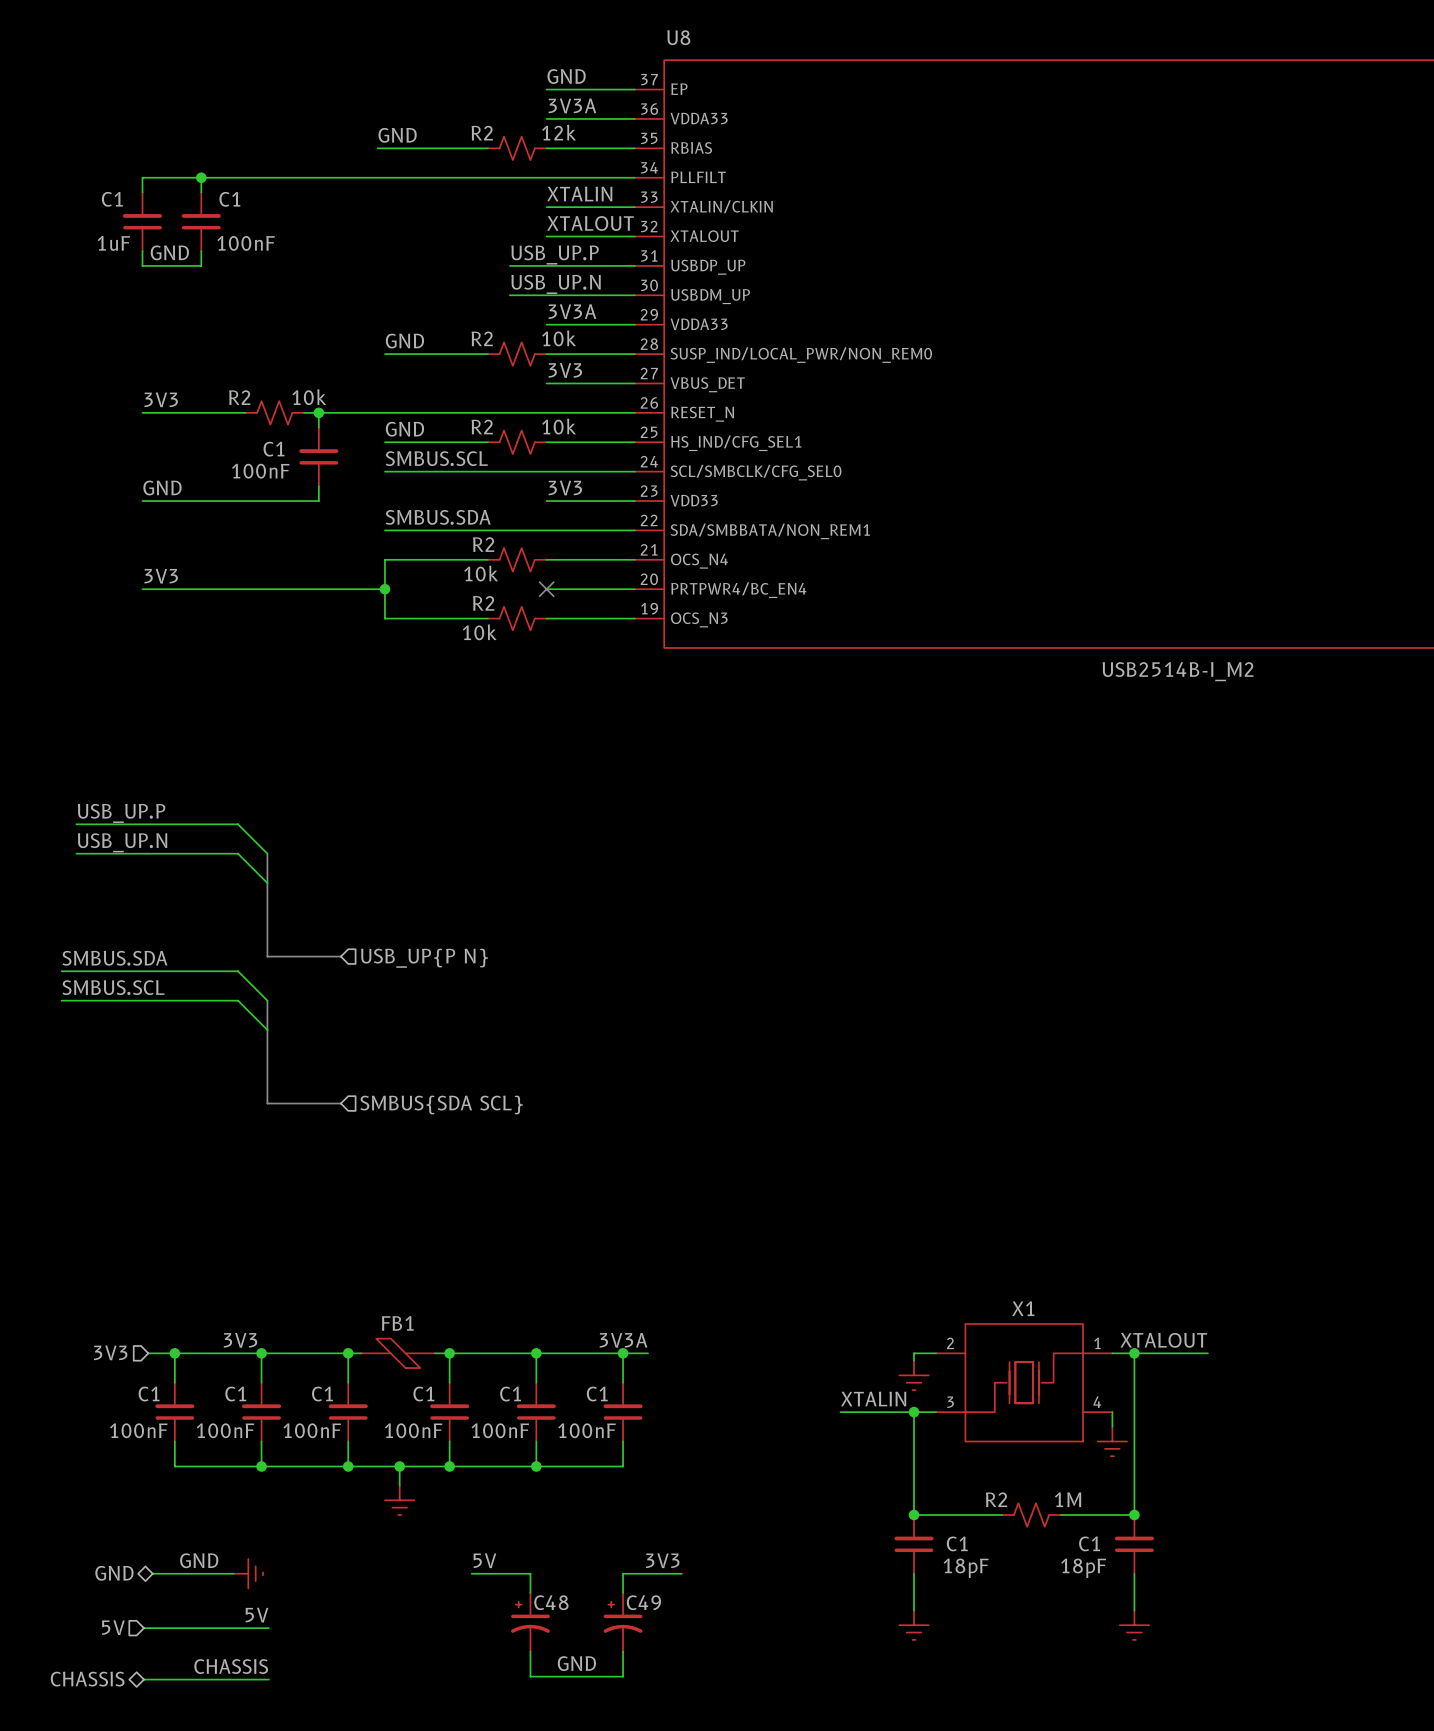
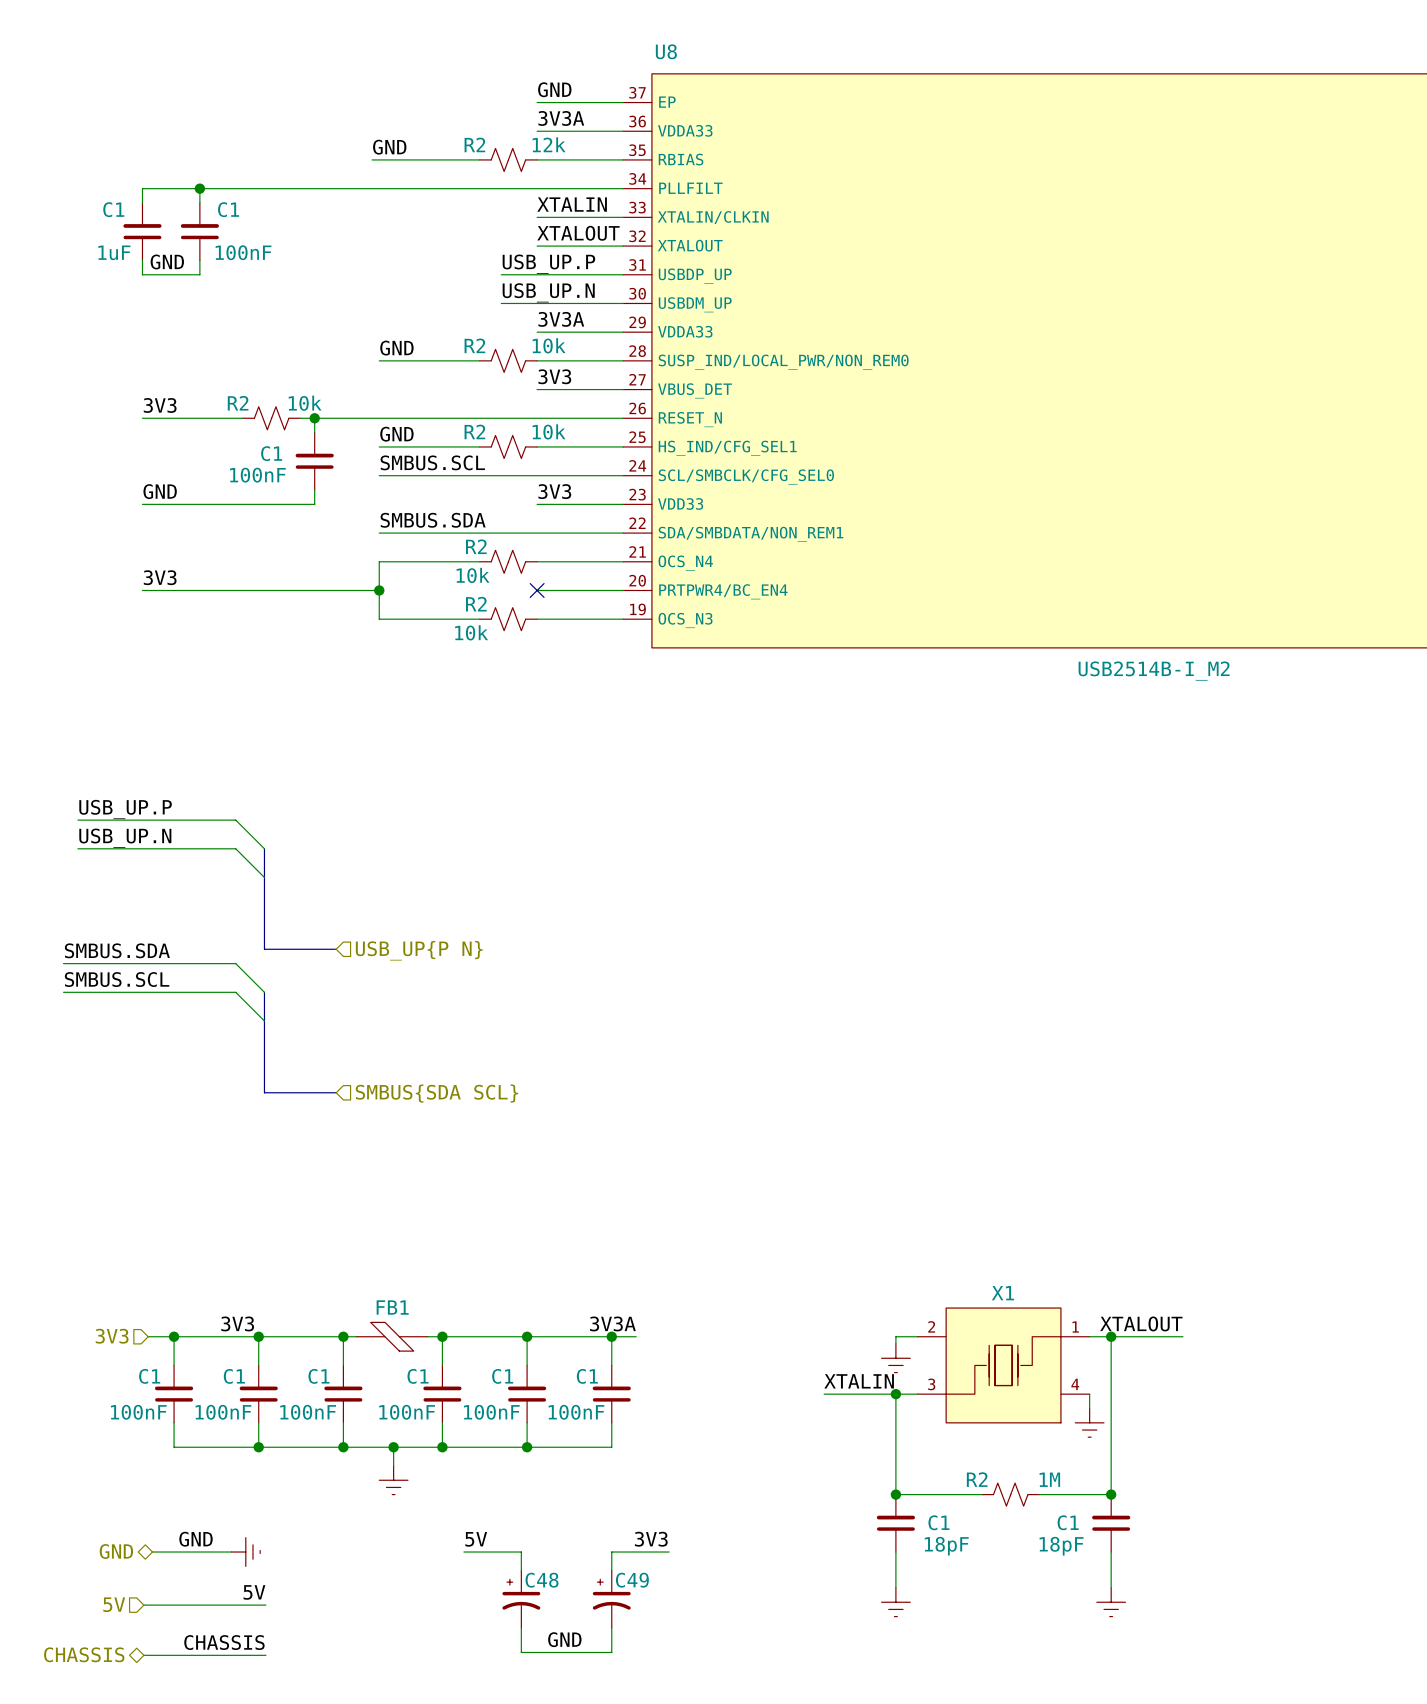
U8 pin name: SDA/SMBBATA/NON_REM1 (770, 531) -> SDA/SMBDATA/NON_REM1 (750, 534)

